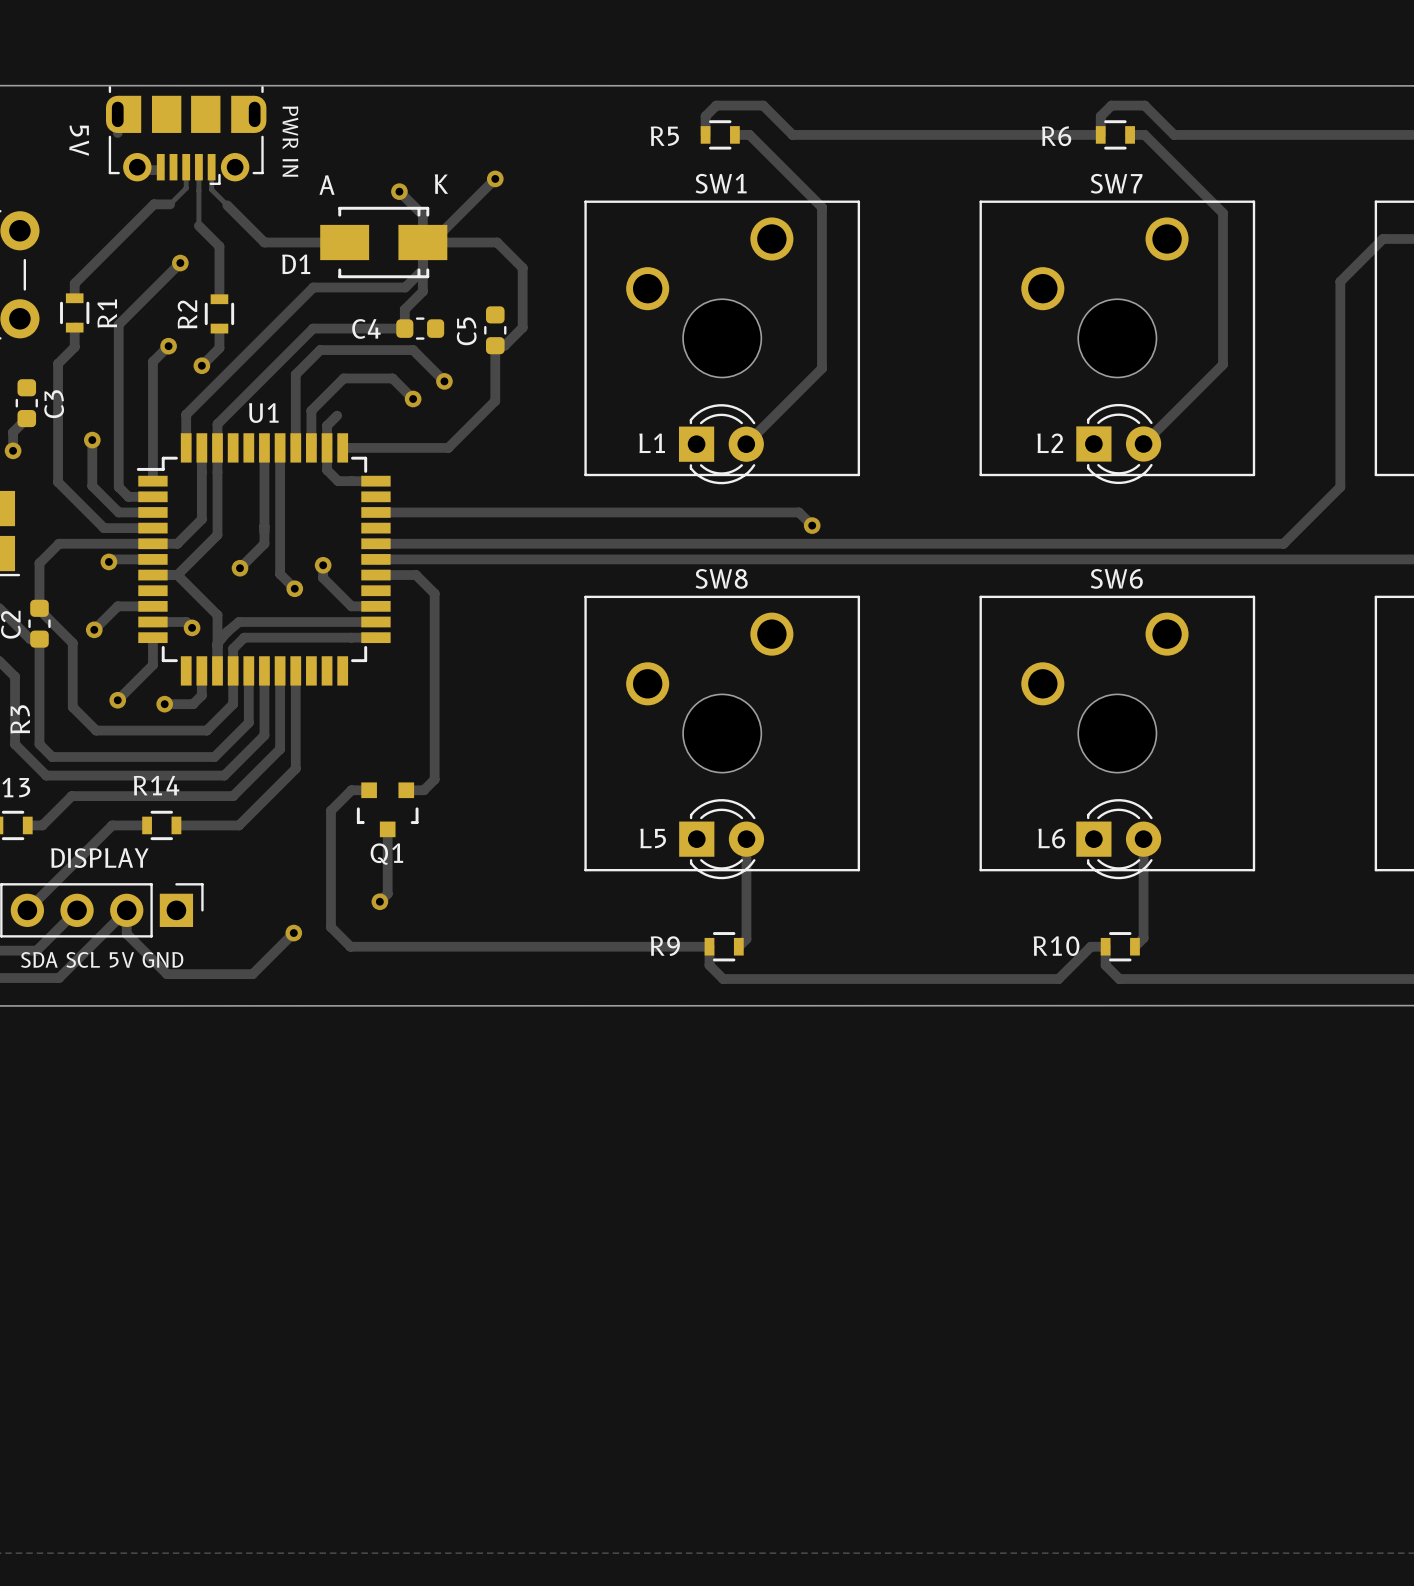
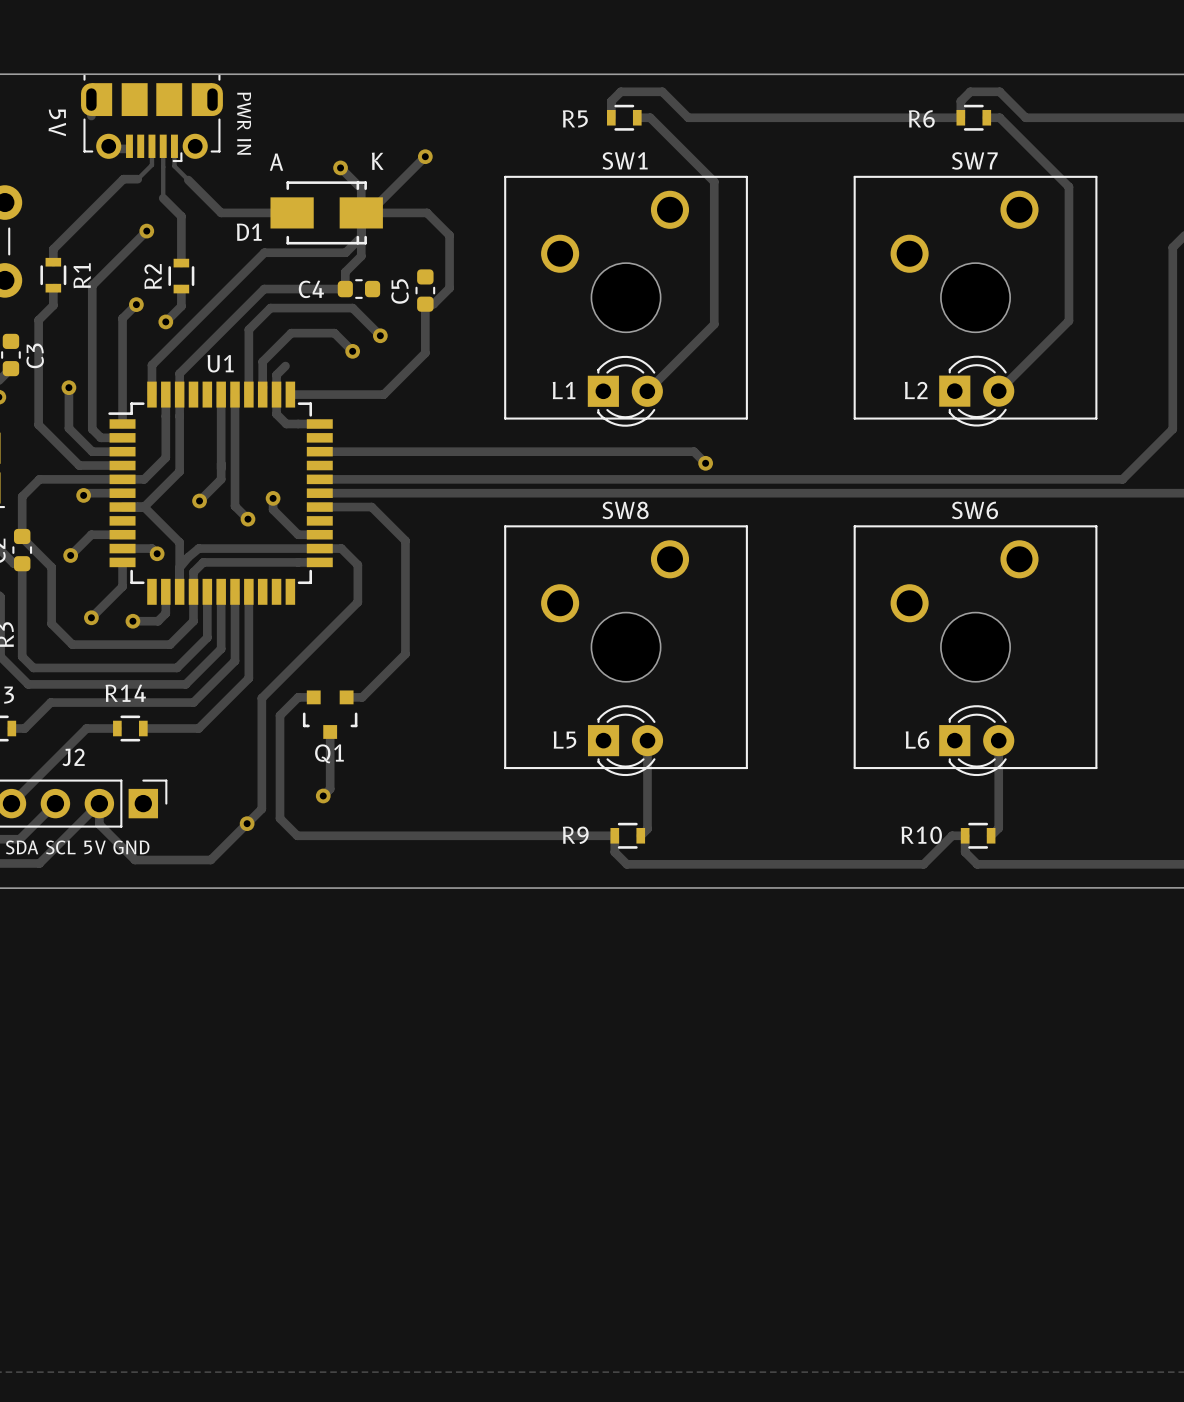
track: (416, 575) (434, 593) (434, 779) -> (355, 507) (371, 507) (405, 540) (405, 654) (371, 687)
track: none -> (319, 548) (341, 548) (357, 565) (357, 602) (261, 698) (261, 808) (247, 823)
DISPLAY name: DISPLAY (99, 858) -> J2 (73, 757)

